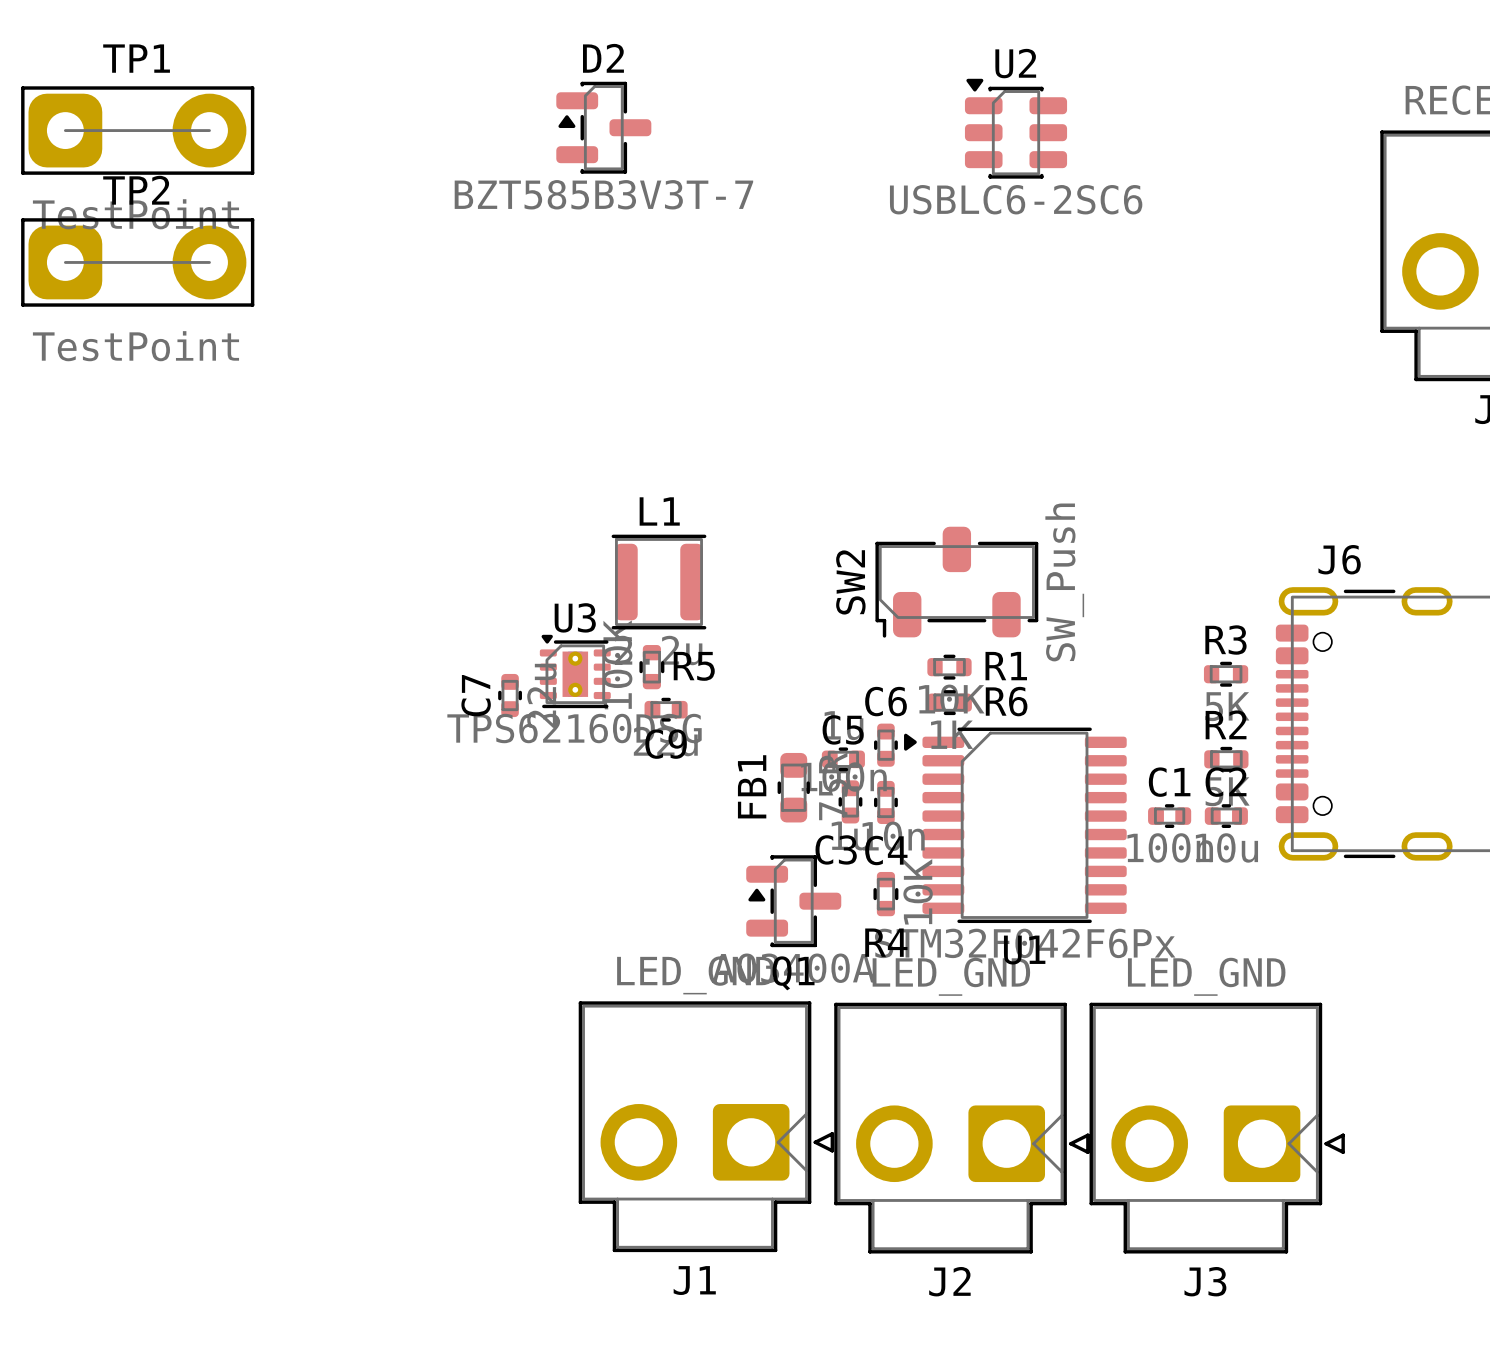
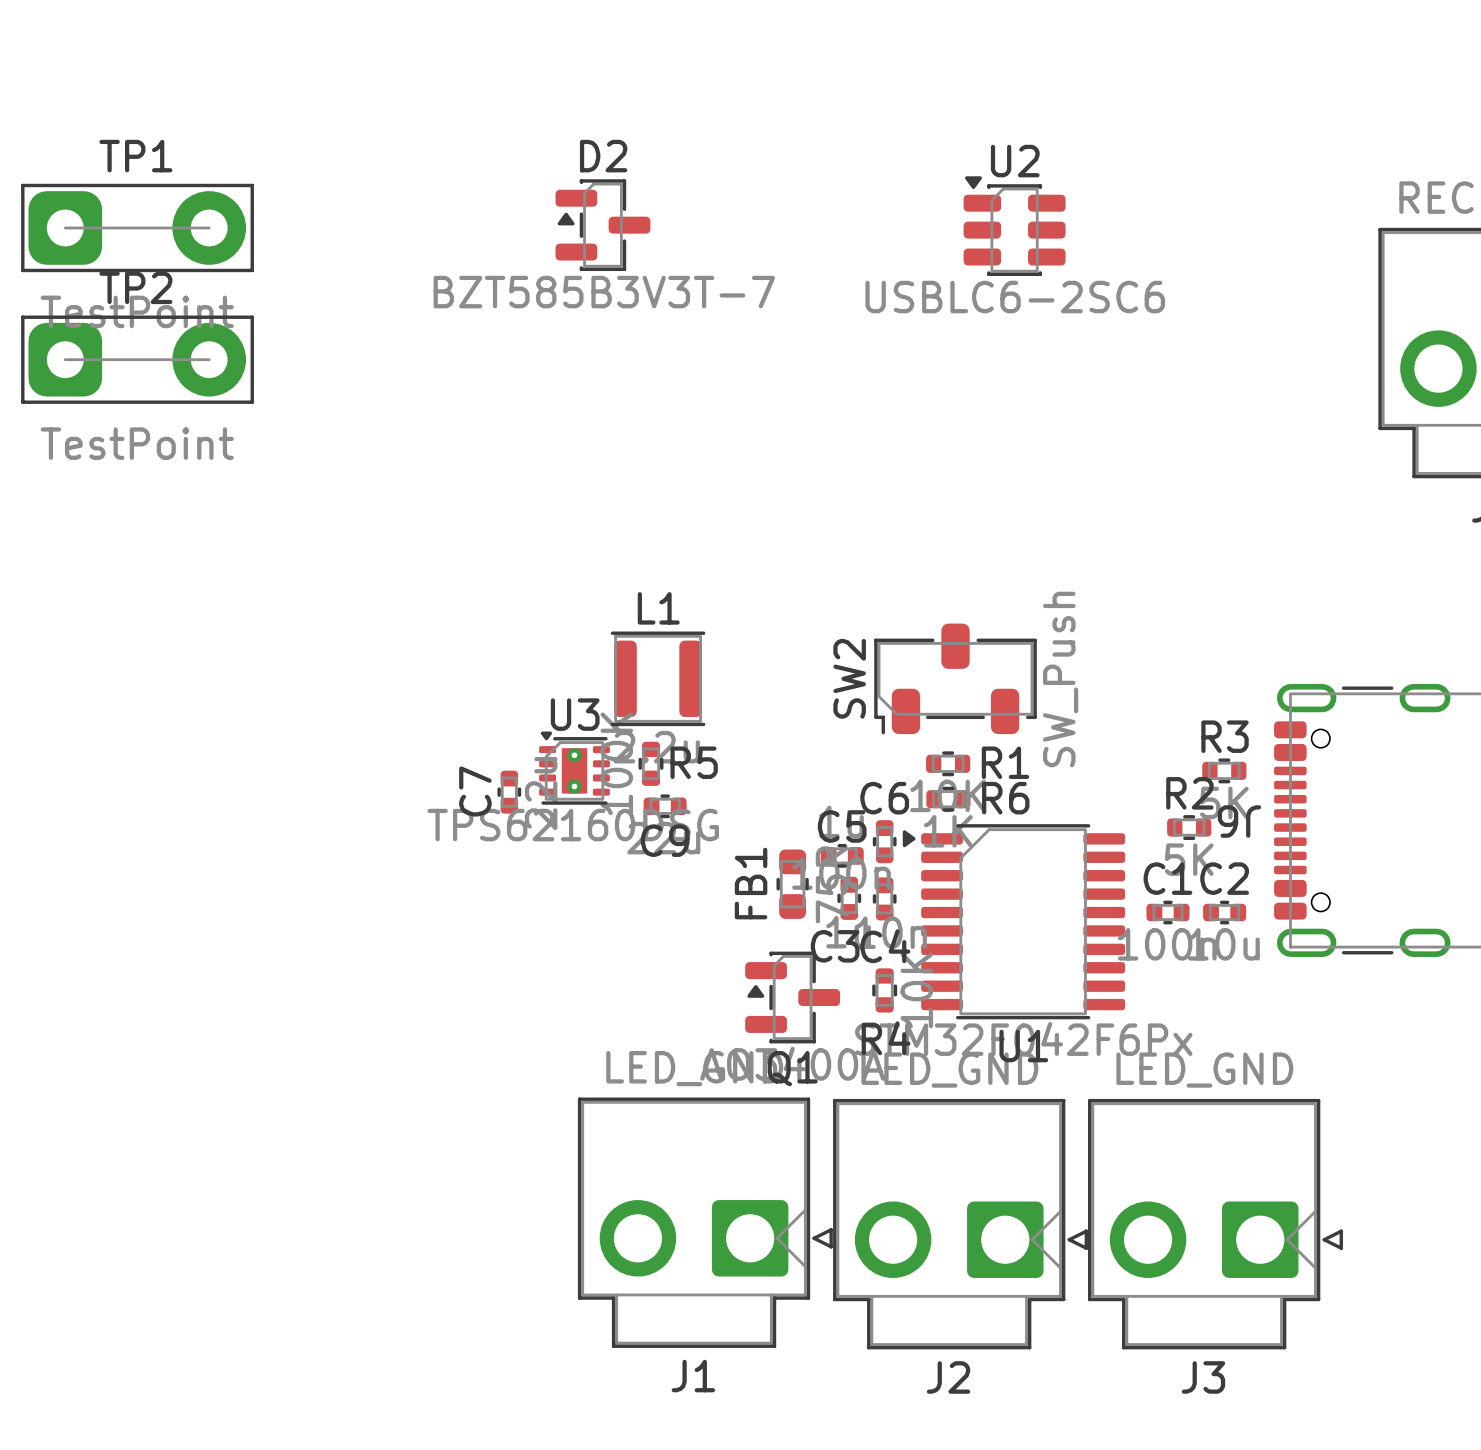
J6 name rotation: 0° (1339, 559) -> 180° (1239, 821)
J6 name position: J6 (1339, 559) -> J6 (1239, 821)
R2 position: (1226, 759) -> (1189, 827)

